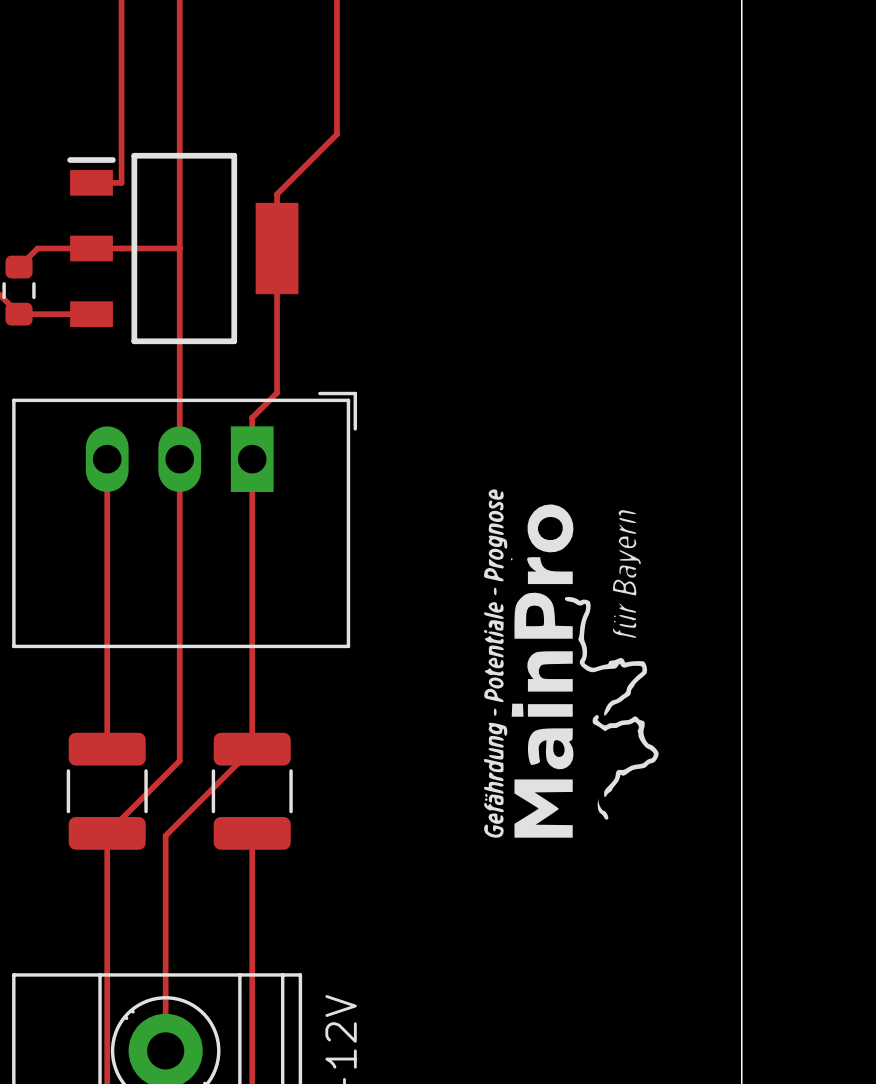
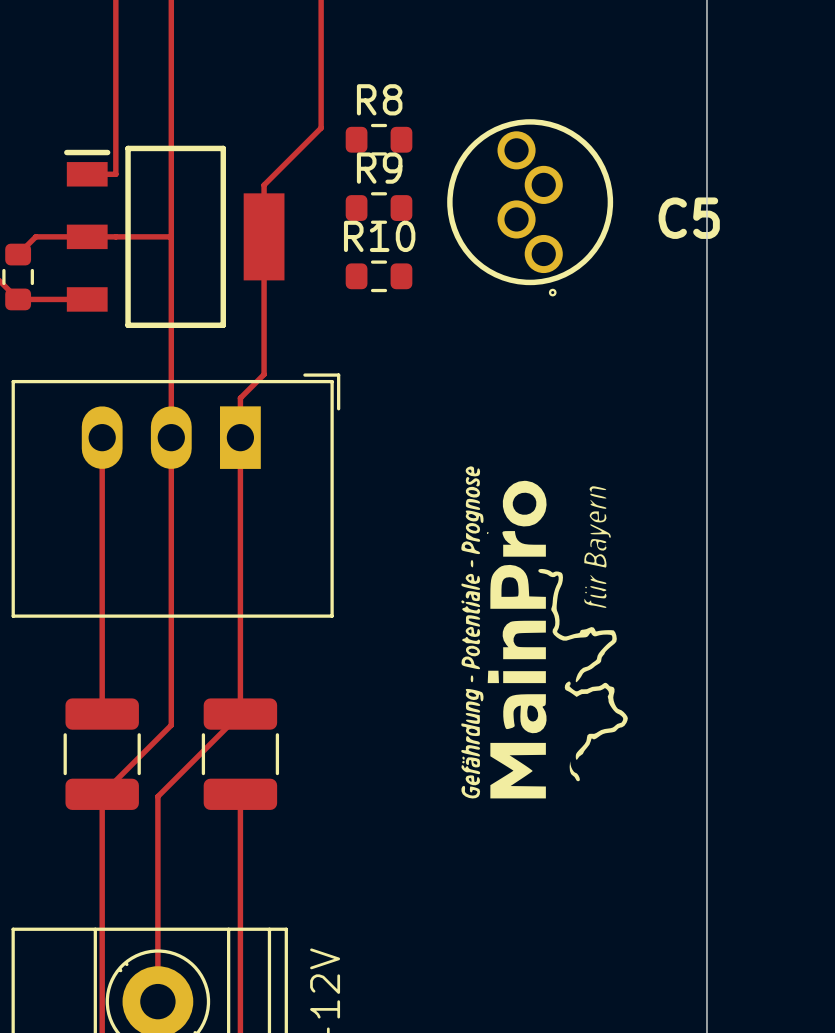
R8: none -> (379, 139)
R9: none -> (379, 208)
C5: none -> (530, 207)
R10: none -> (379, 276)

